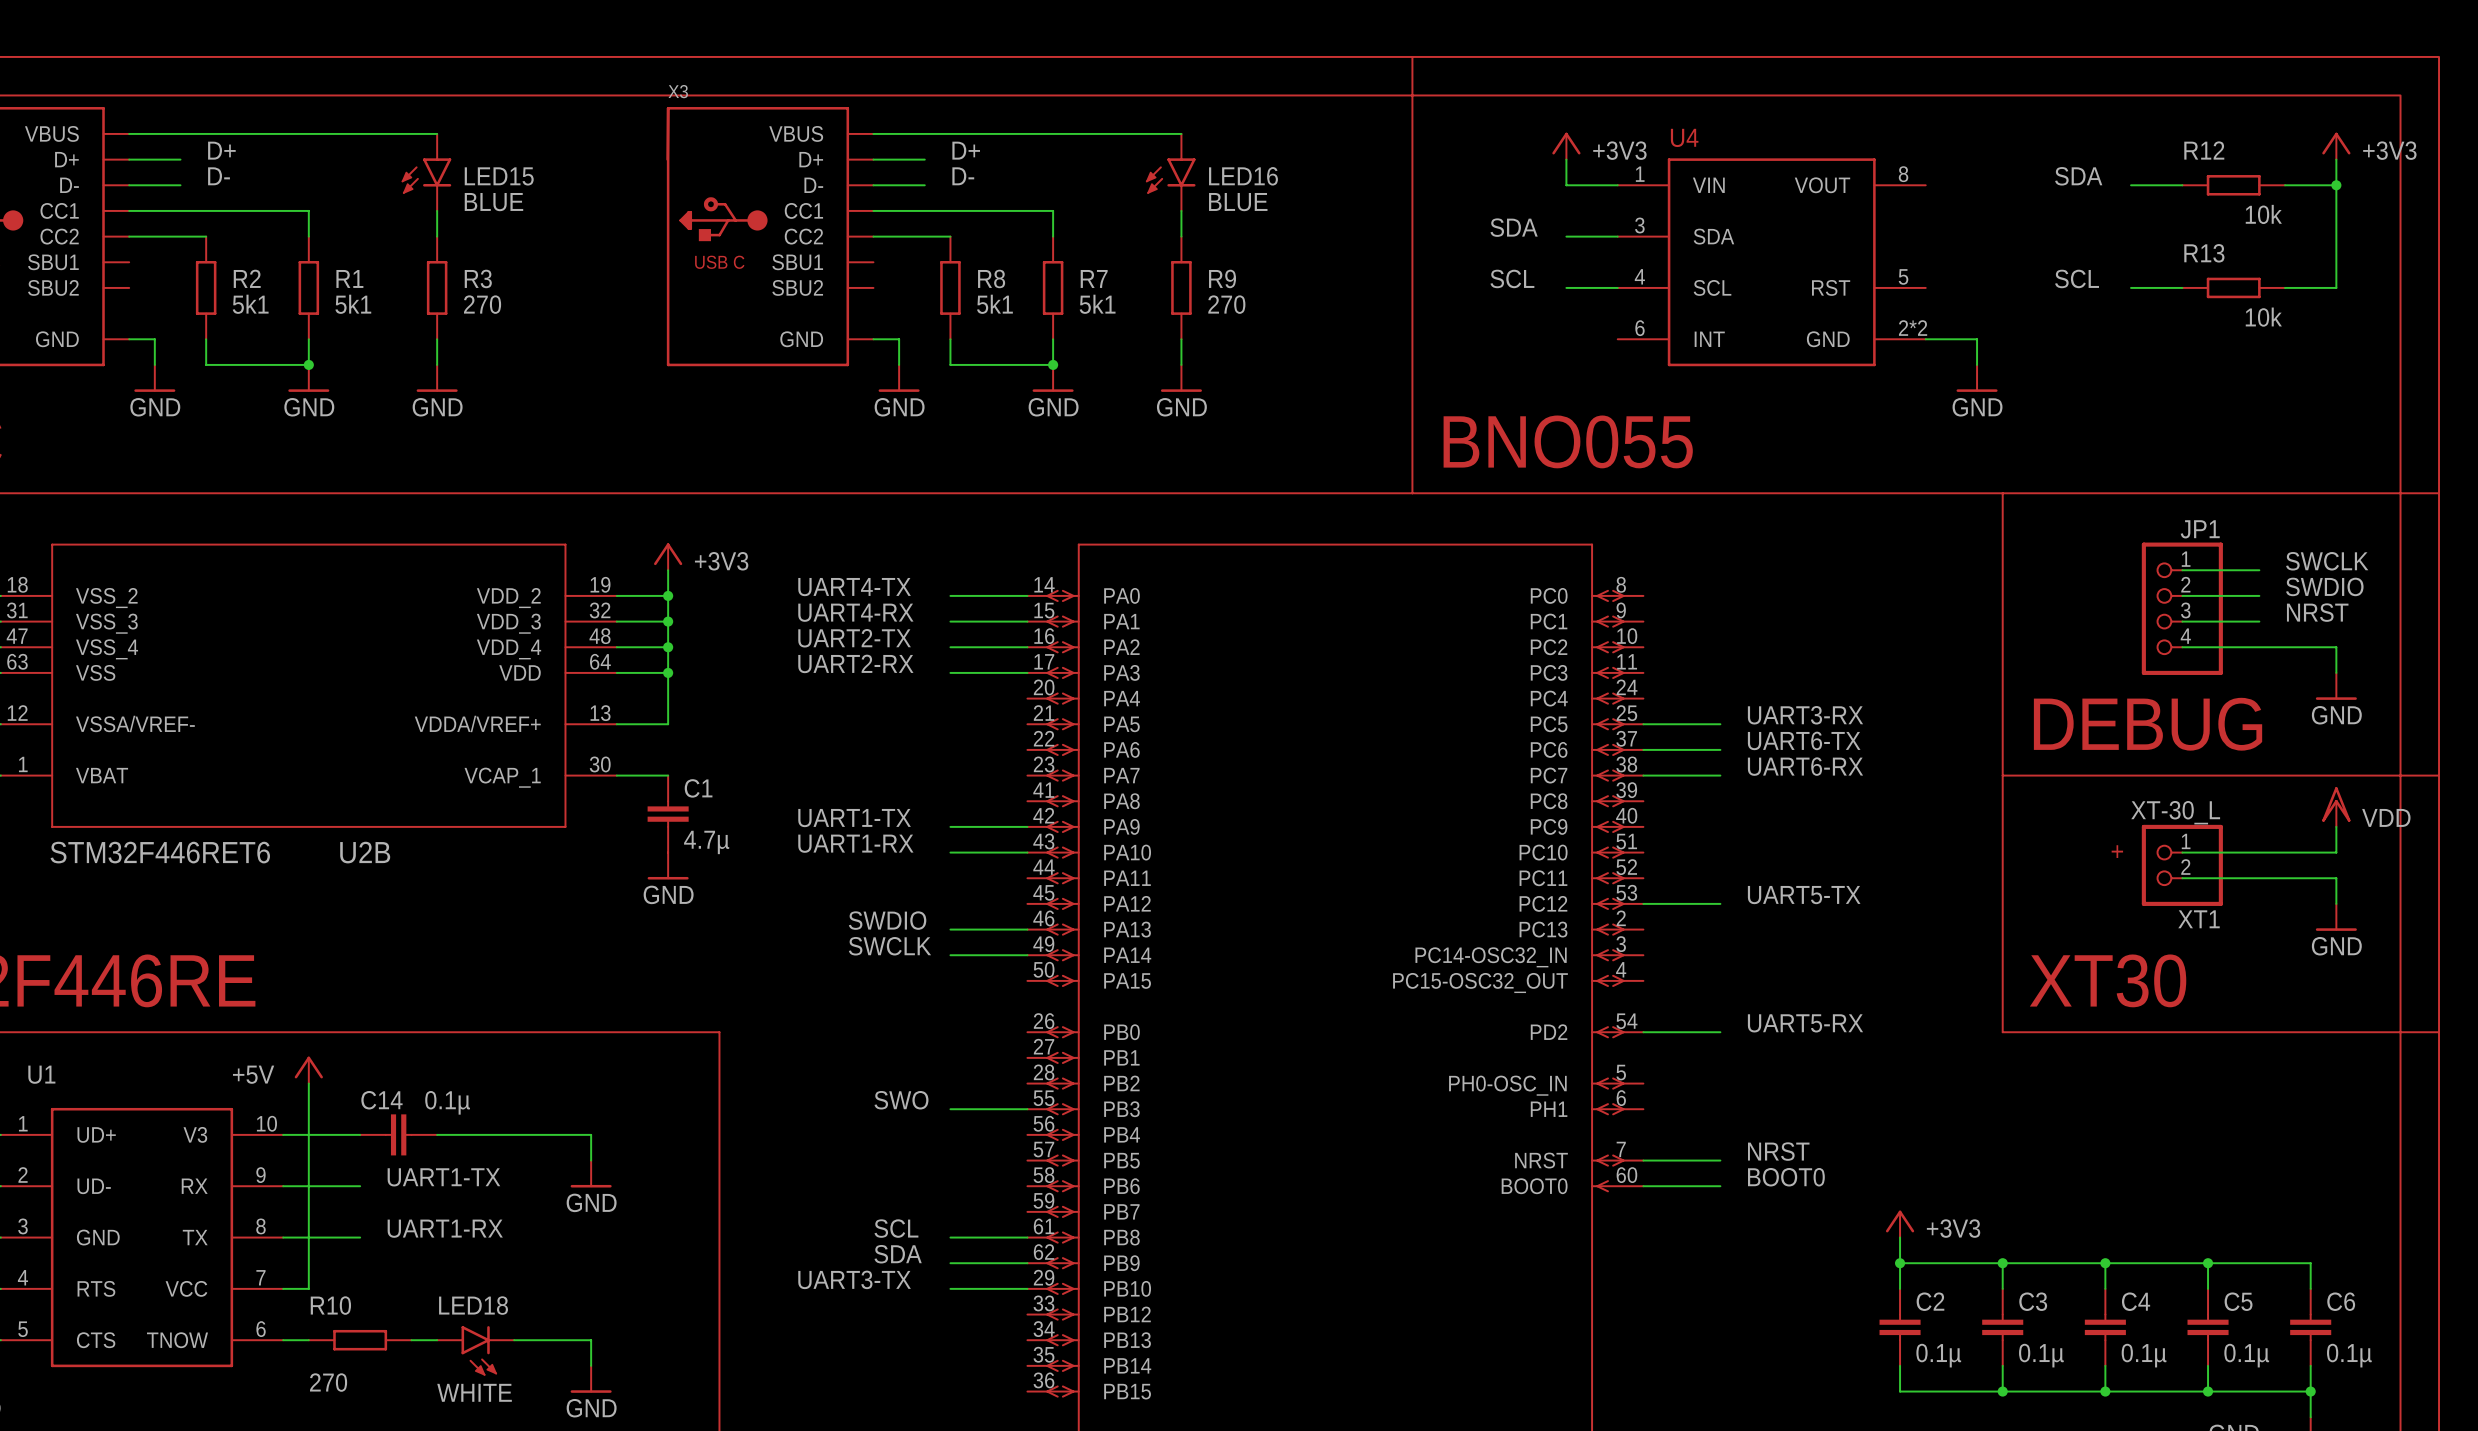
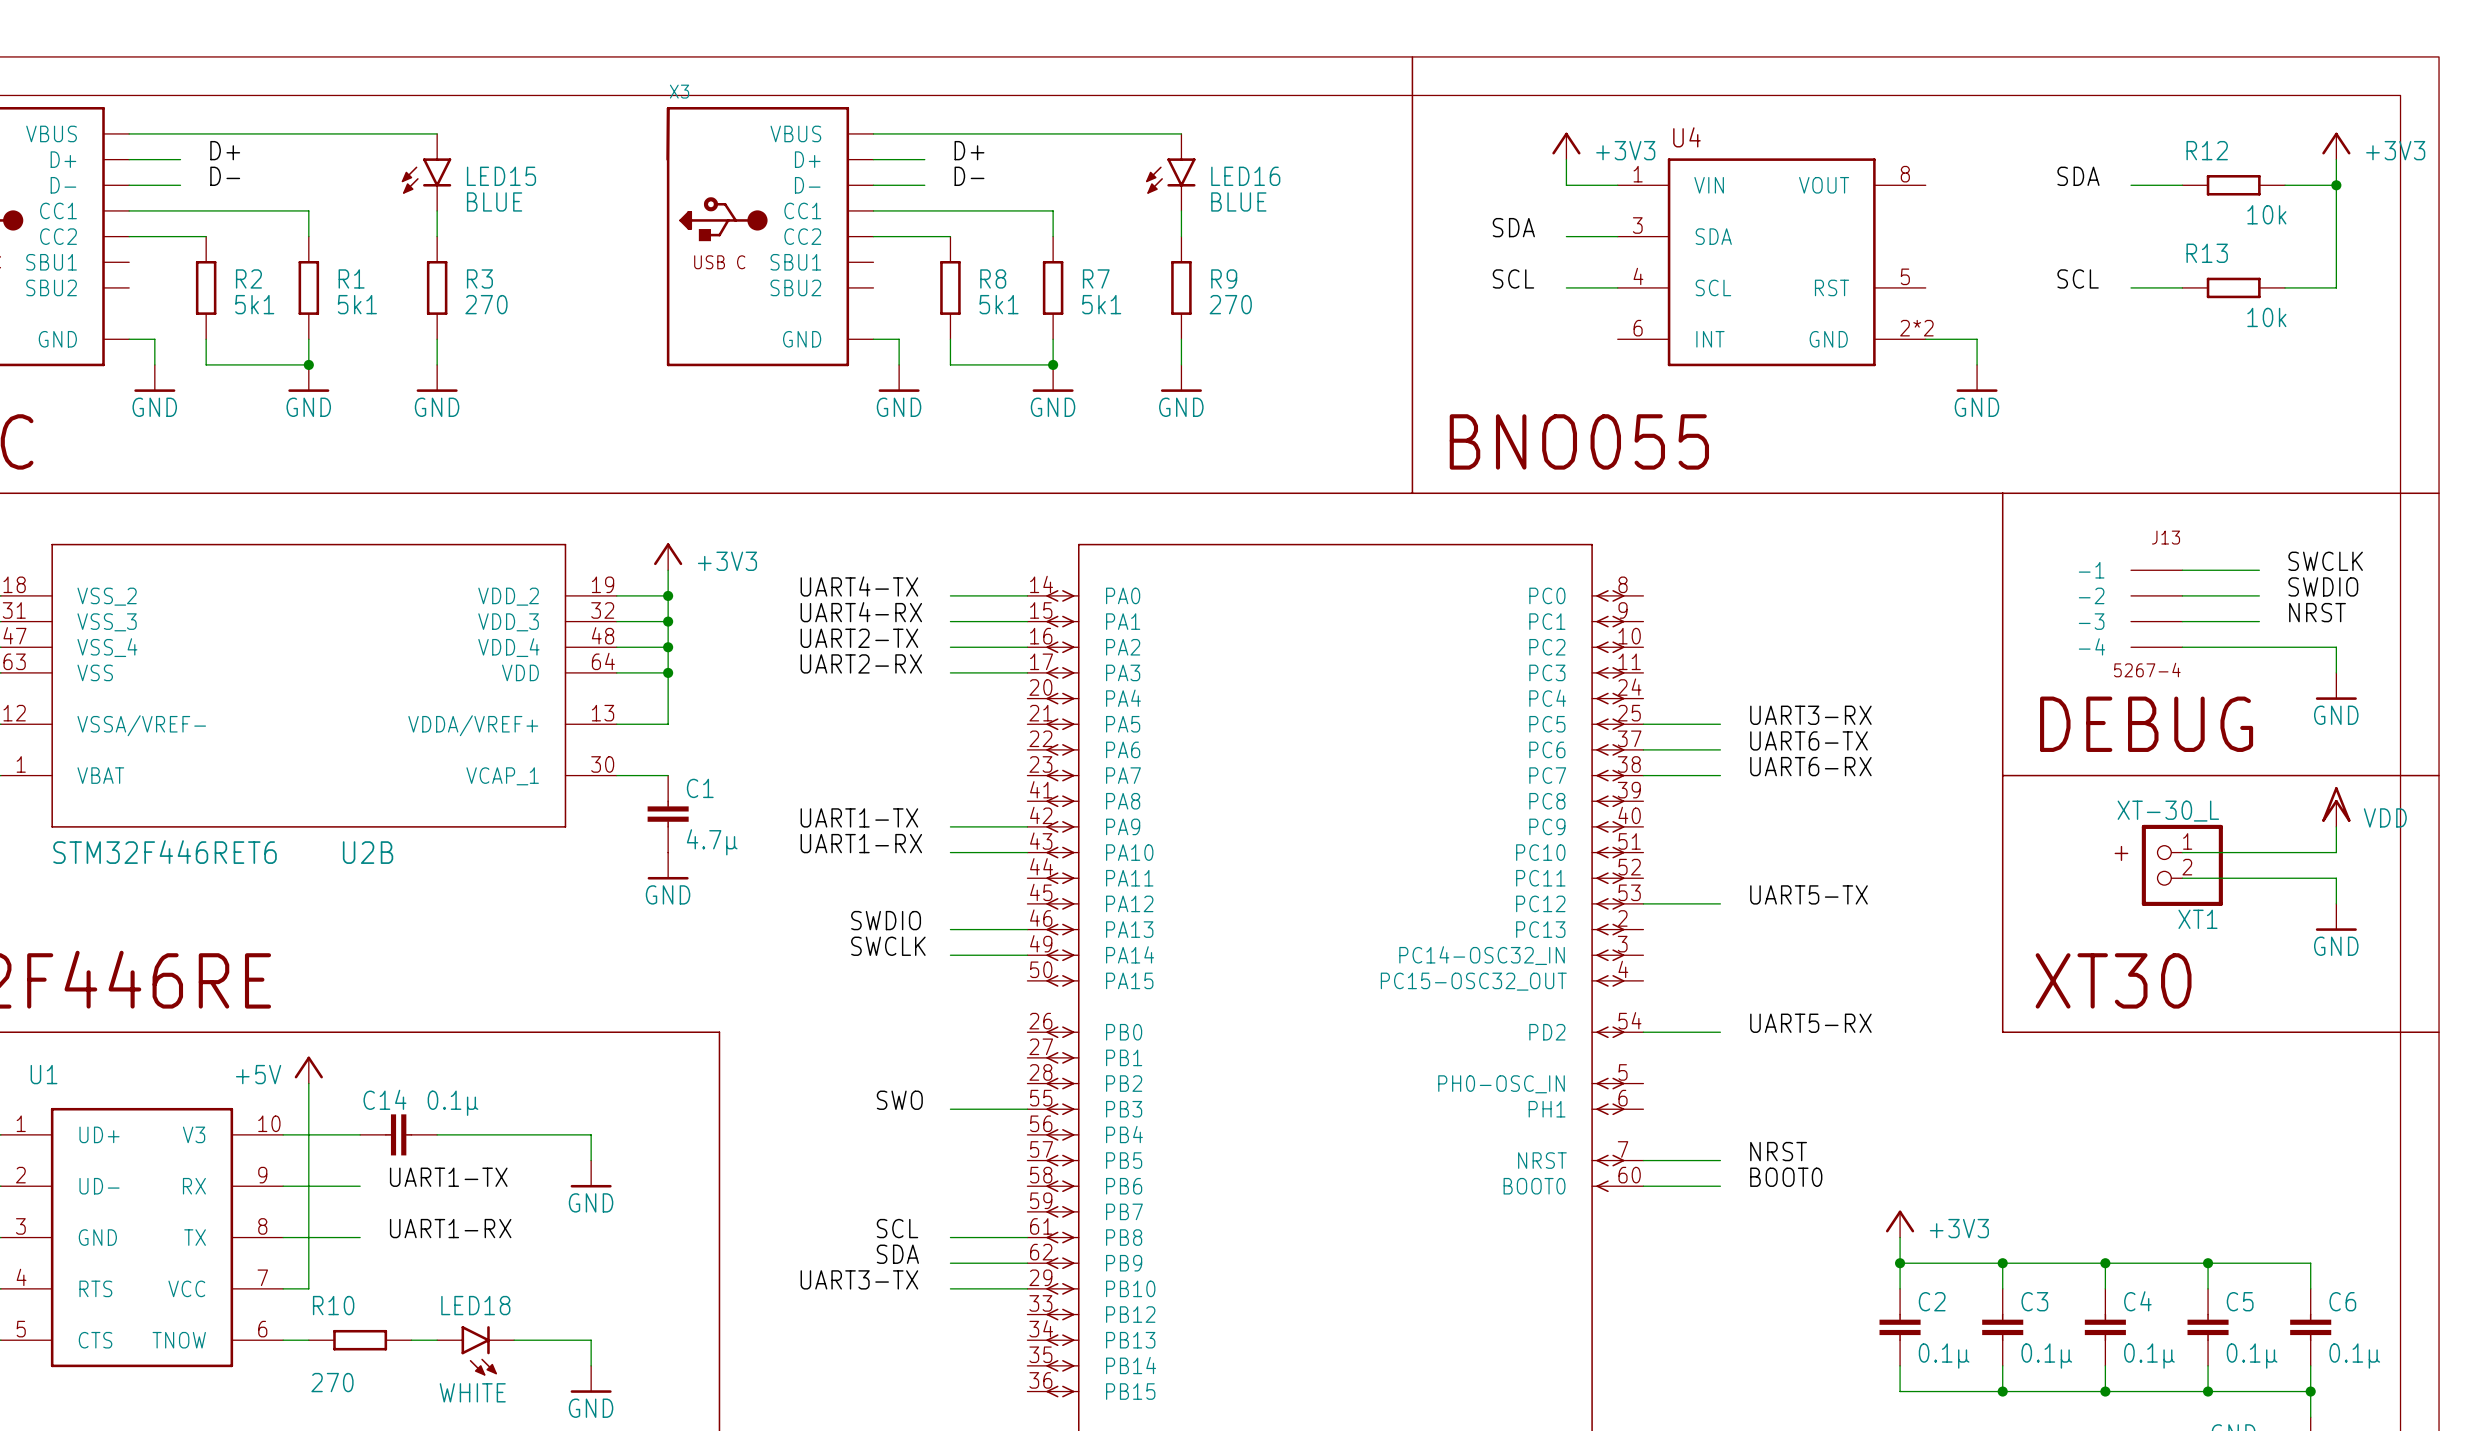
J13: none -> 5267-4 (2156, 608)
JP1: (2182, 608) -> none

